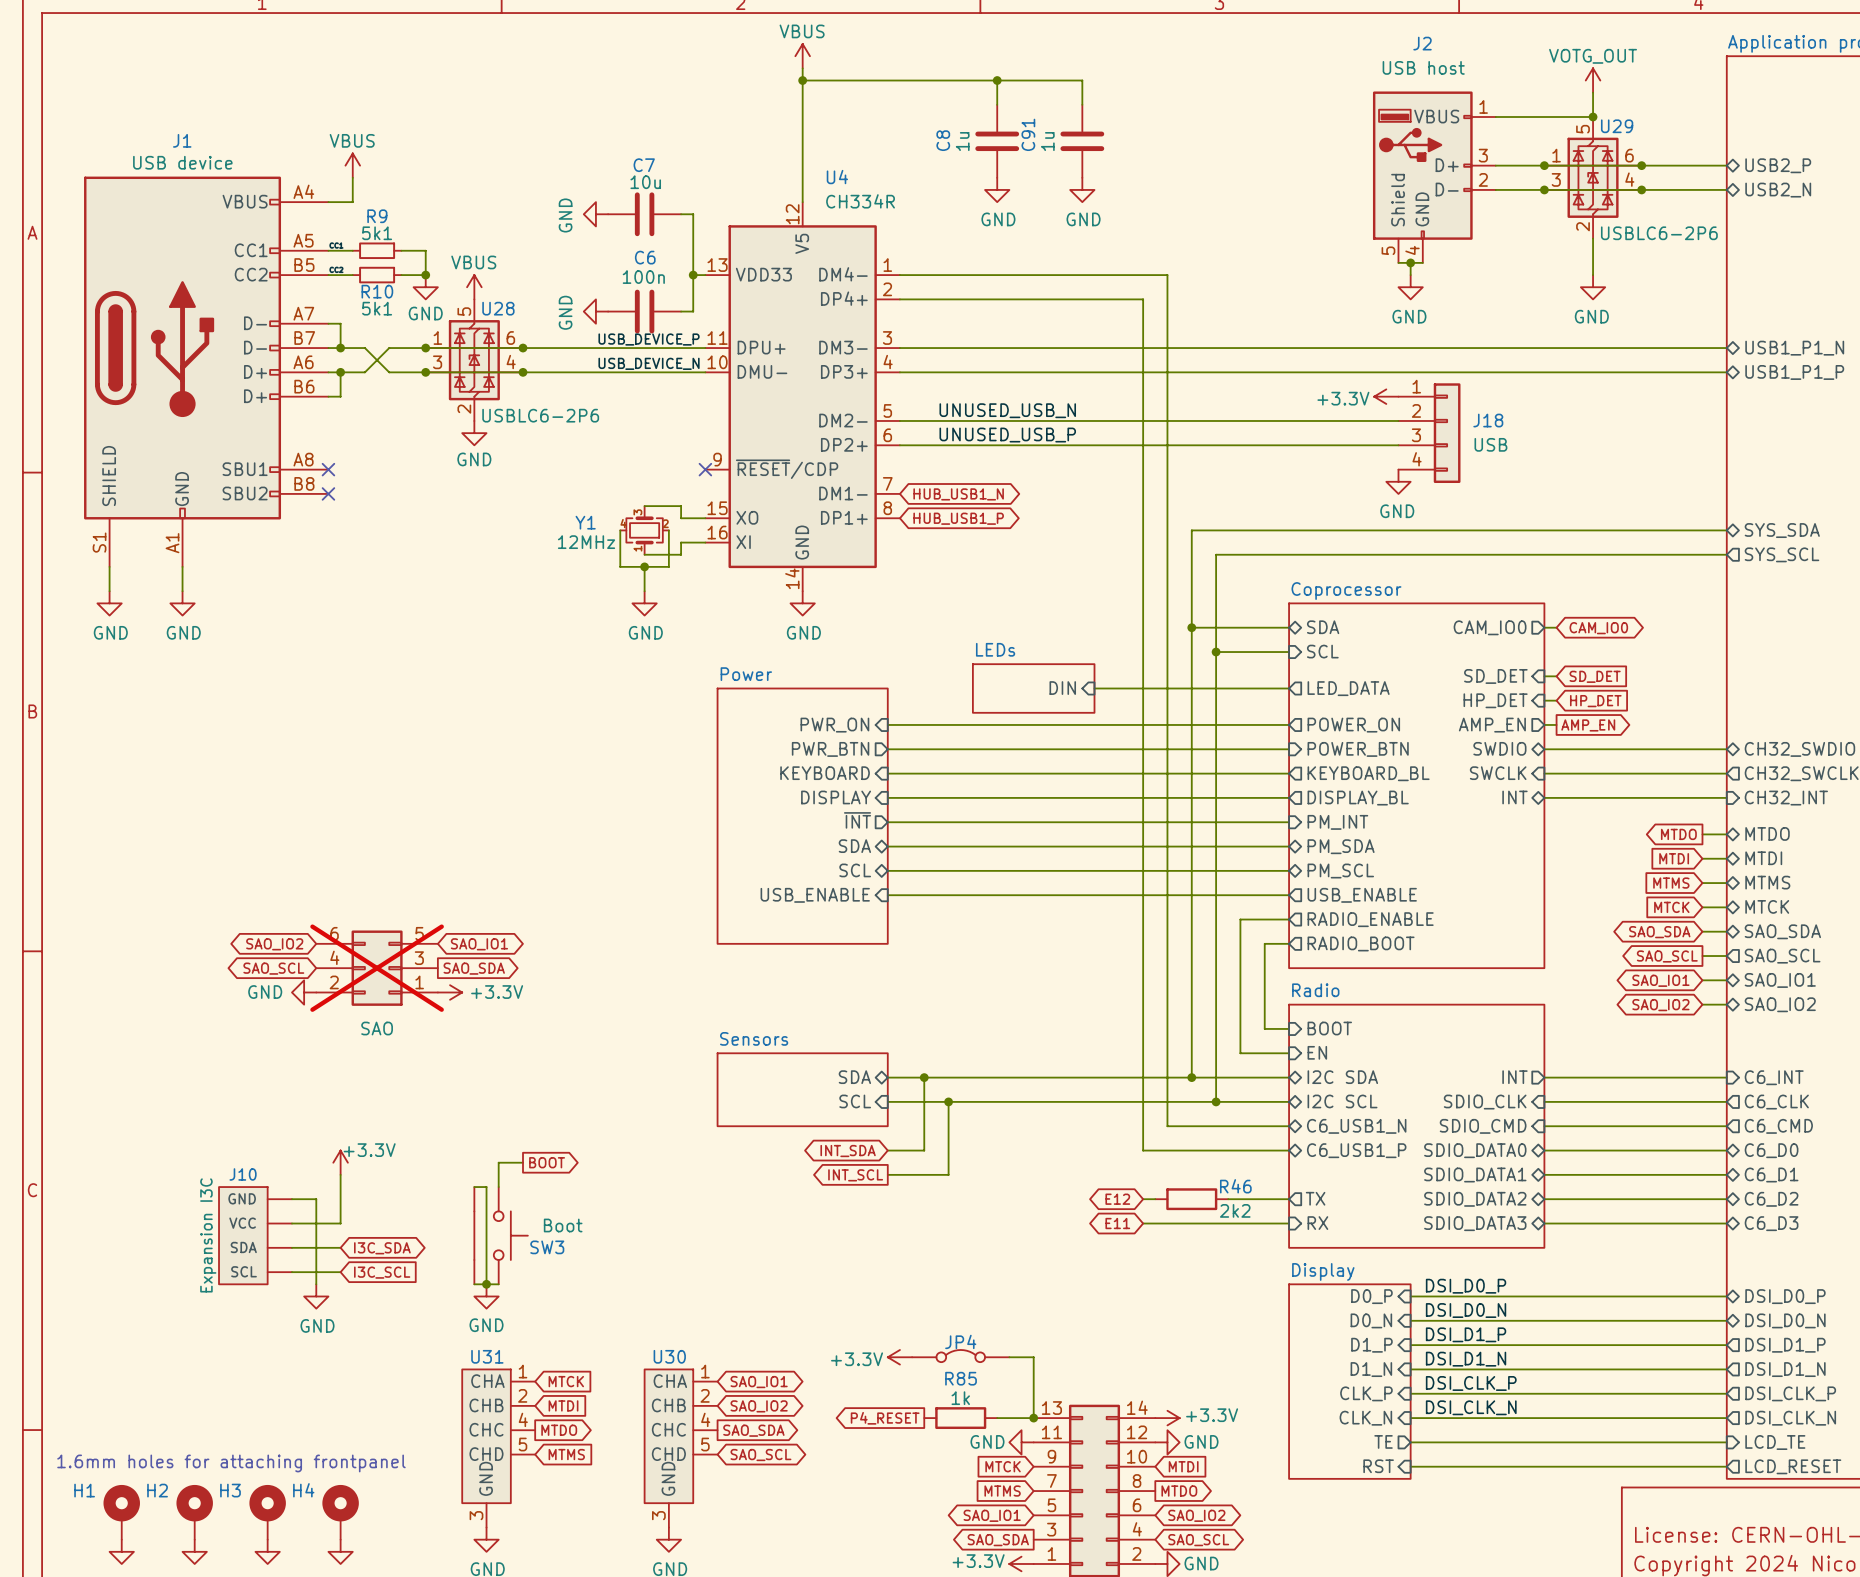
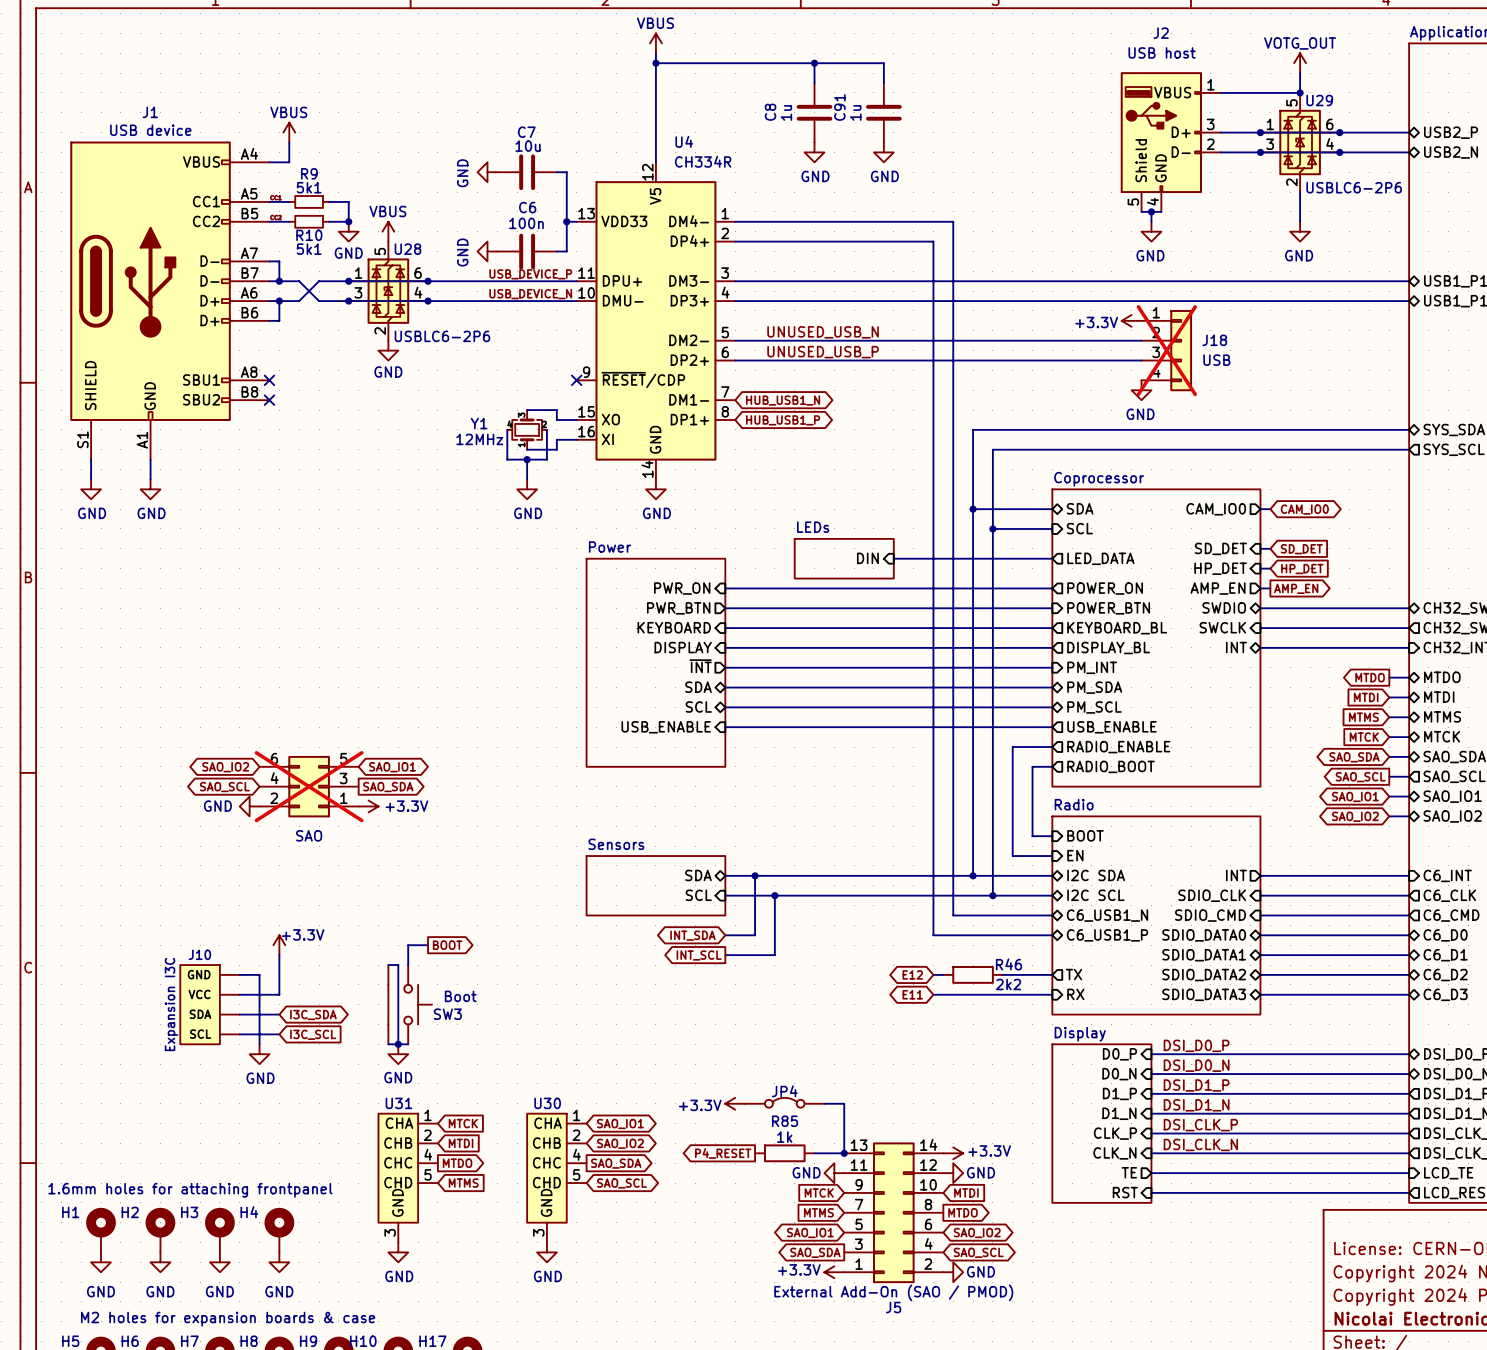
J18 do-not-place cross: none -> (1166, 350)

